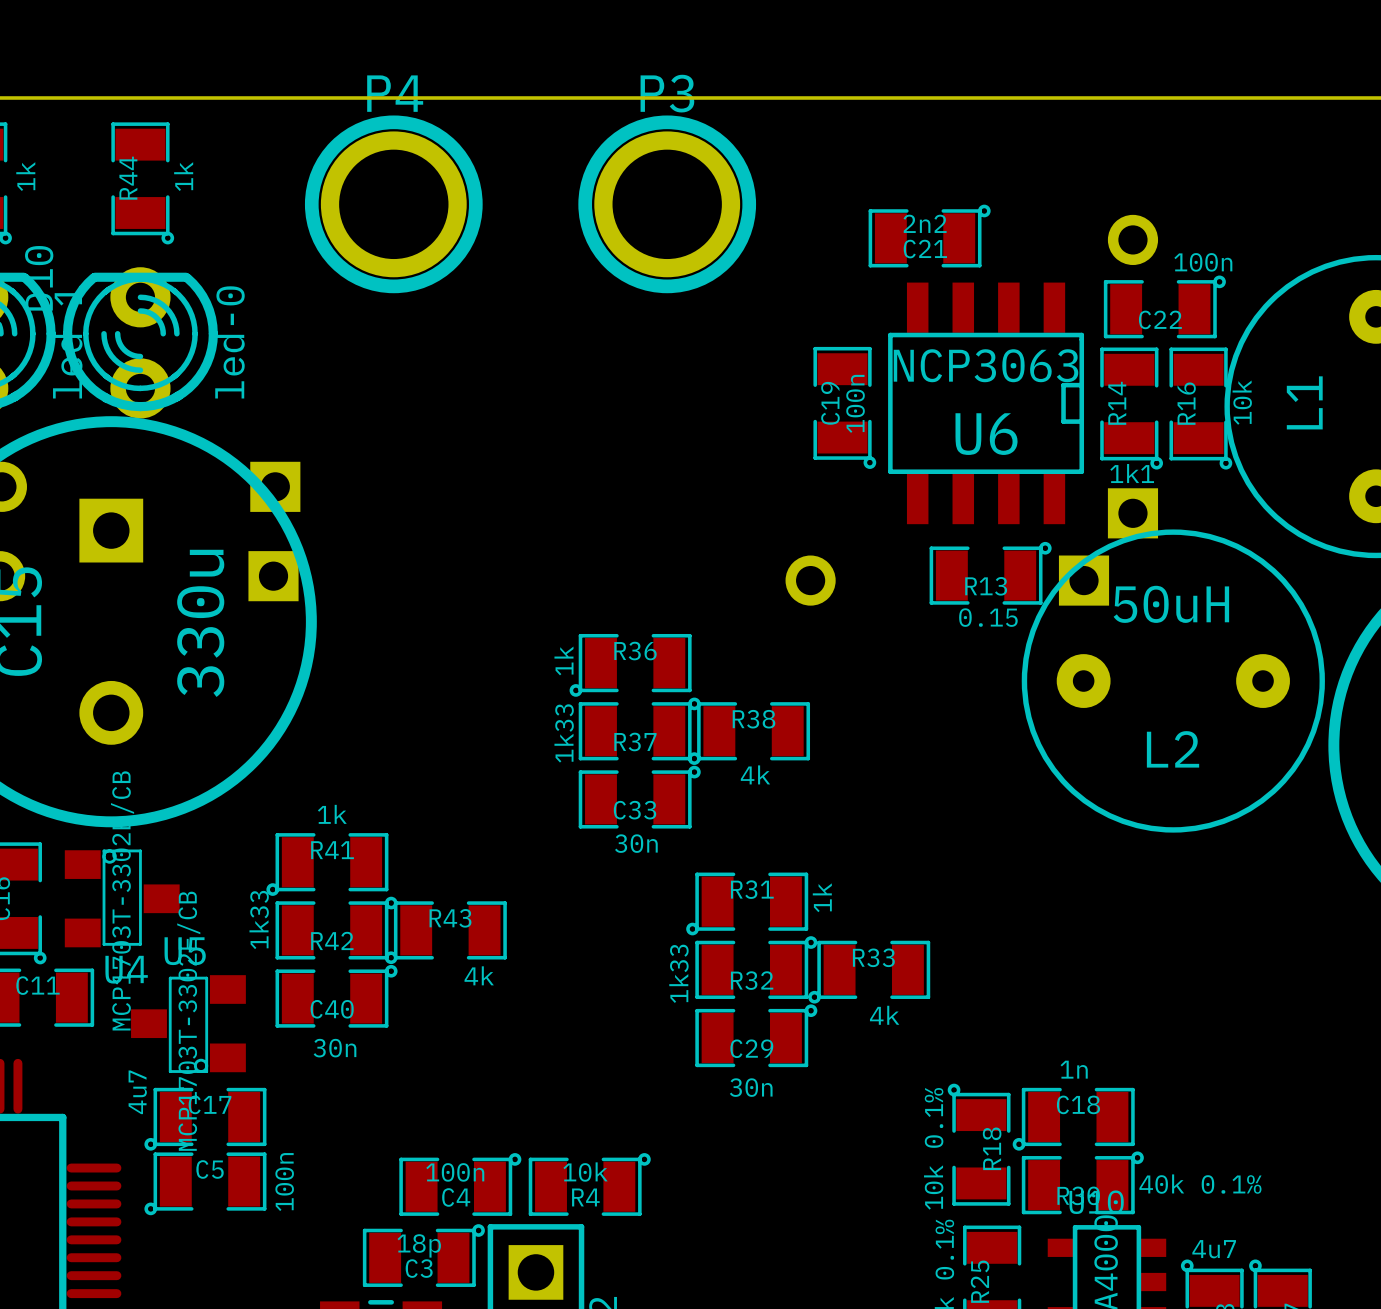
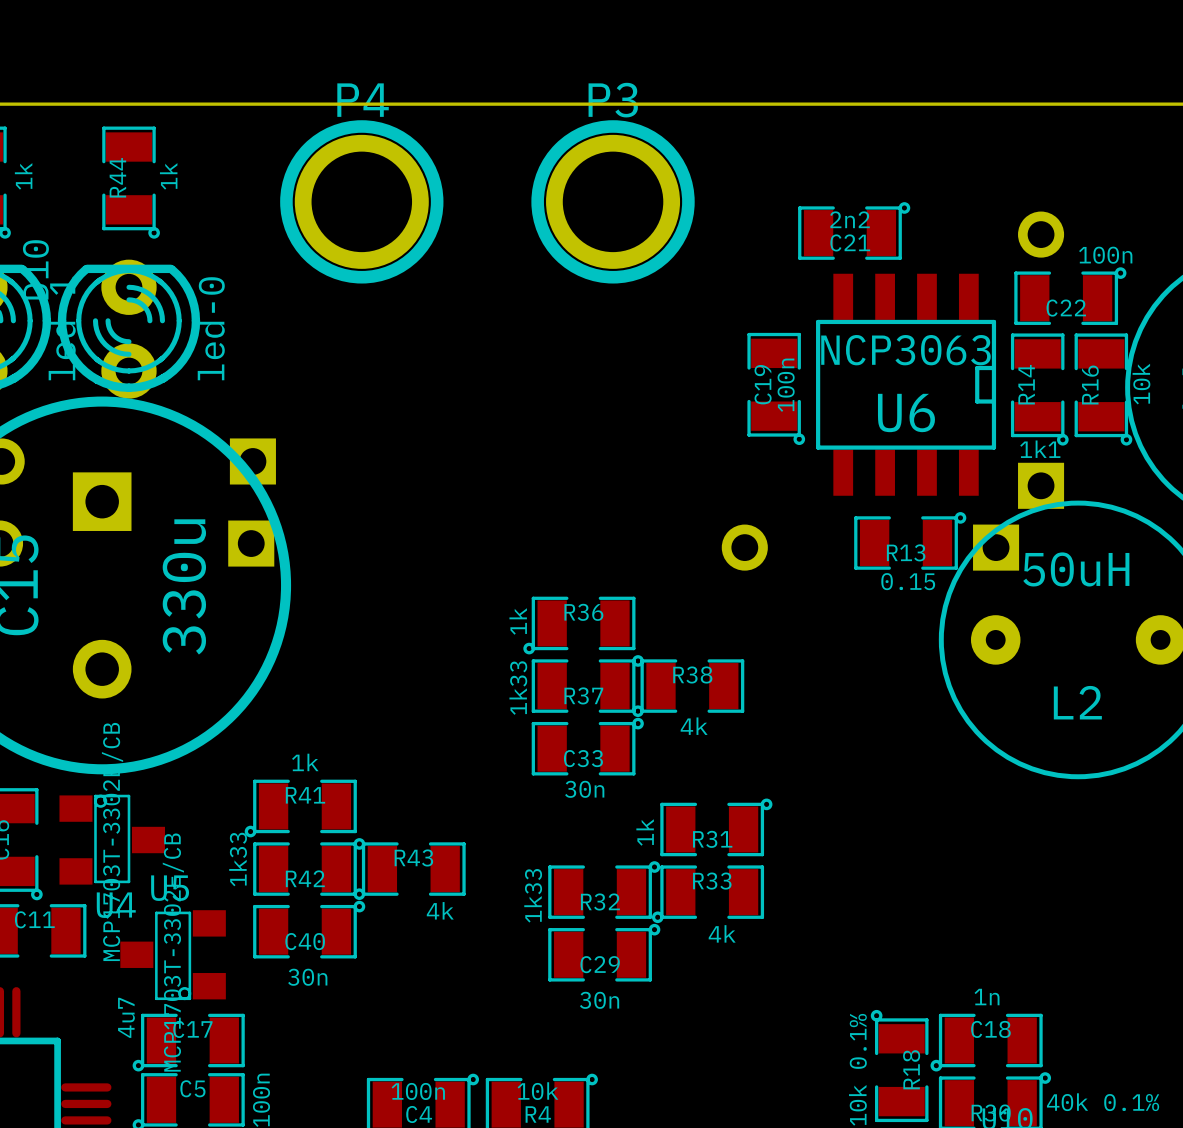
R31 rotation: 0° (747, 903) -> 180° (716, 827)
R32 position: (756, 967) -> (604, 890)
R33 position: (869, 972) -> (707, 894)
C29 position: (756, 1035) -> (604, 952)

